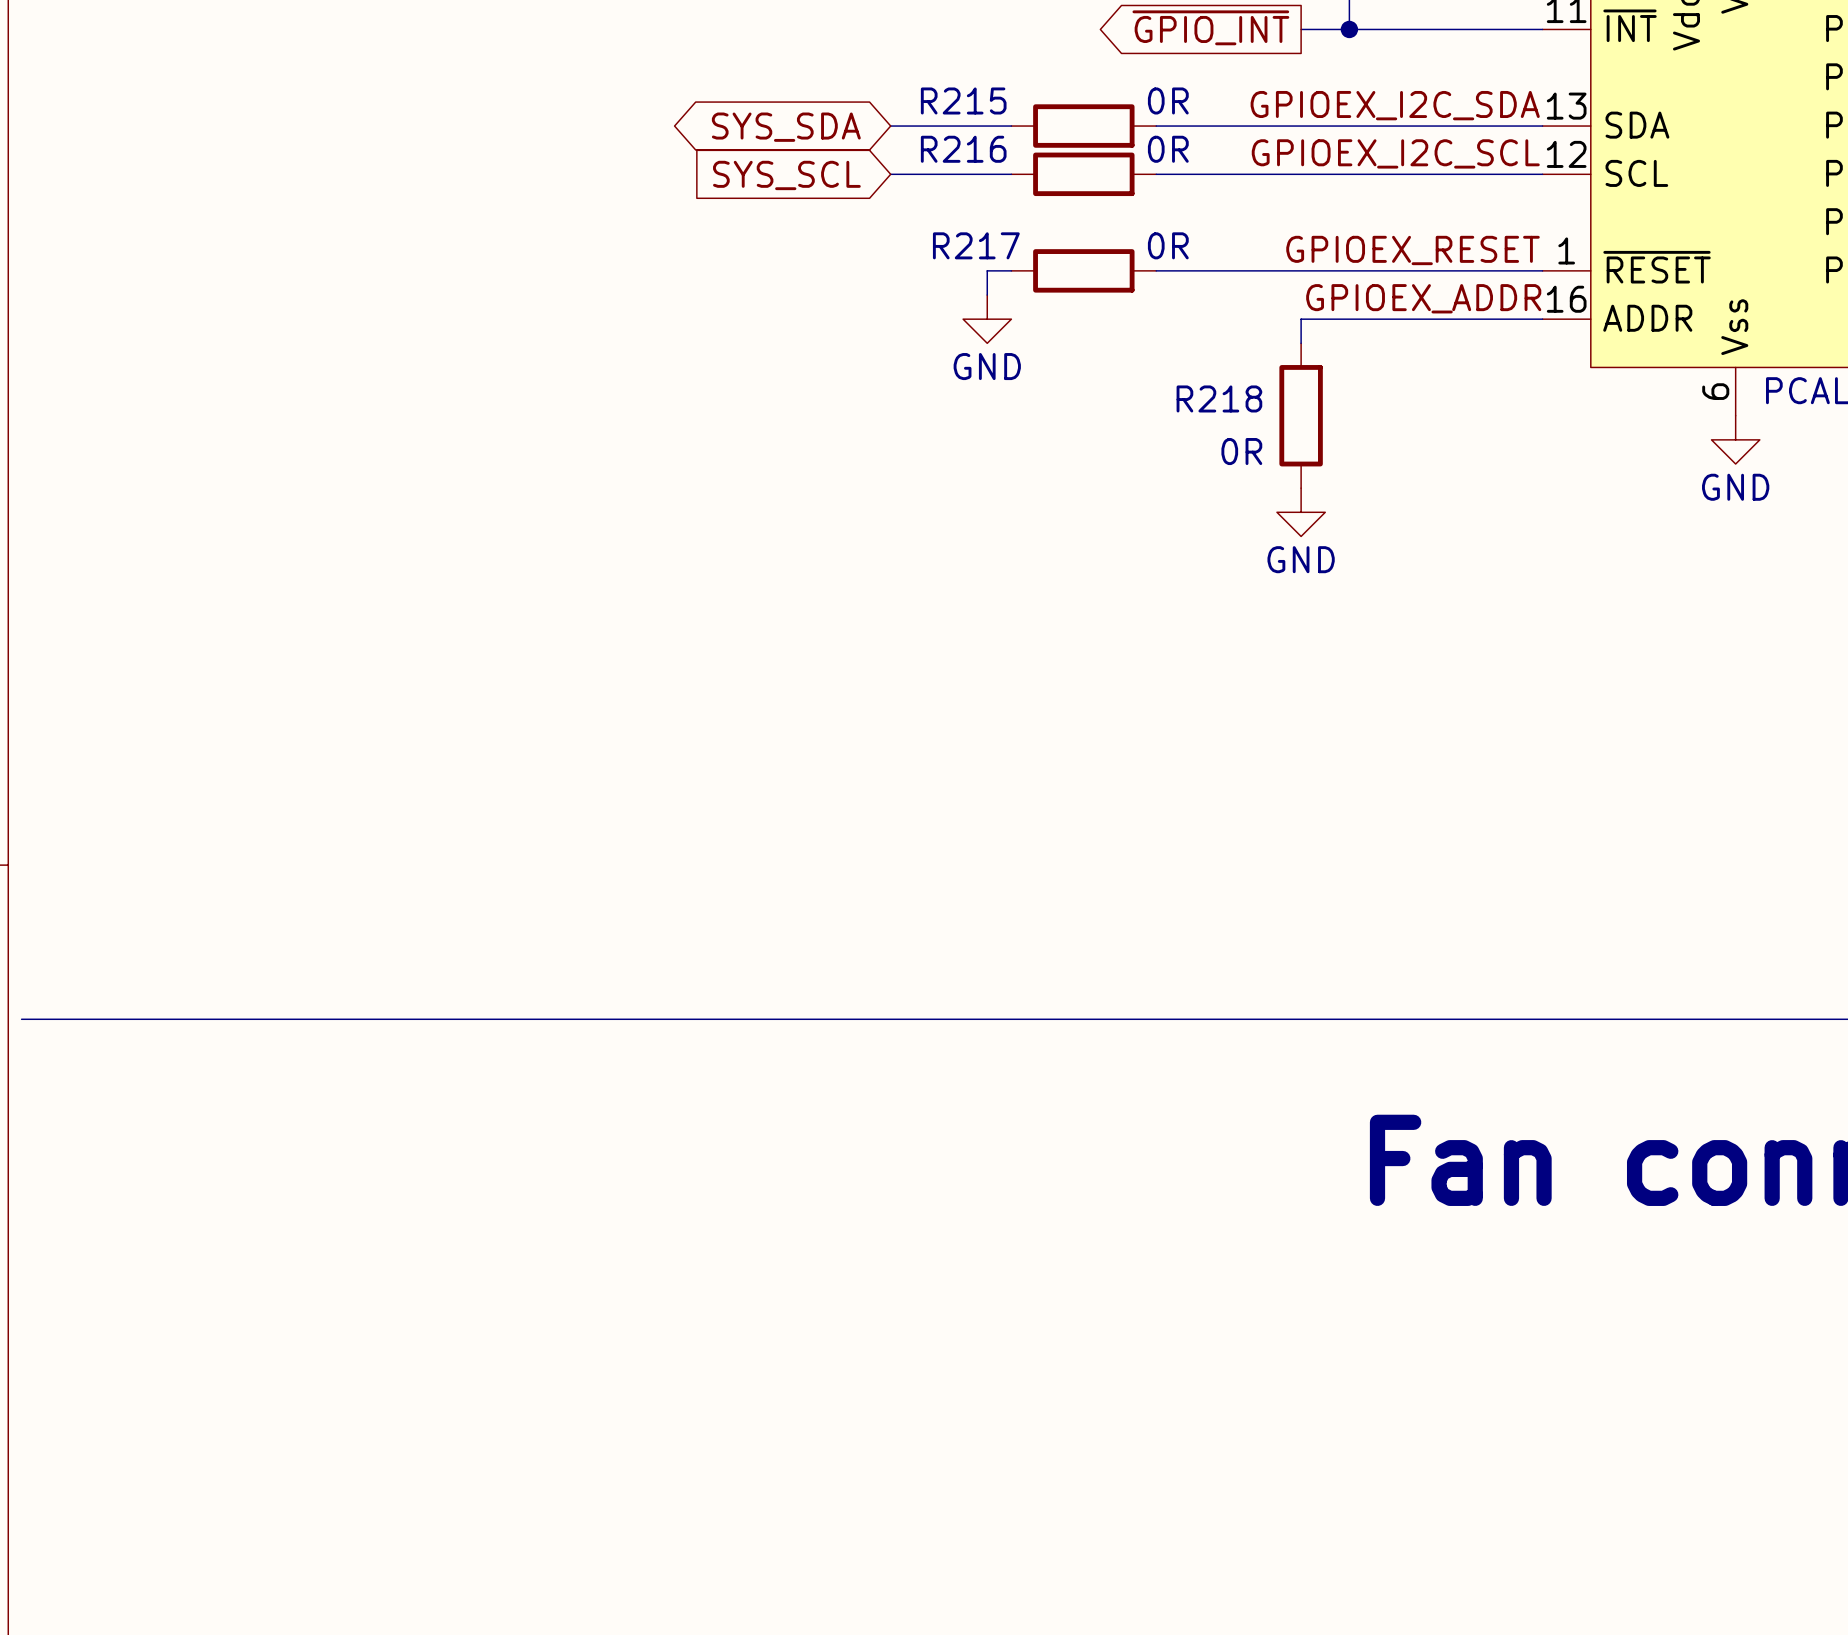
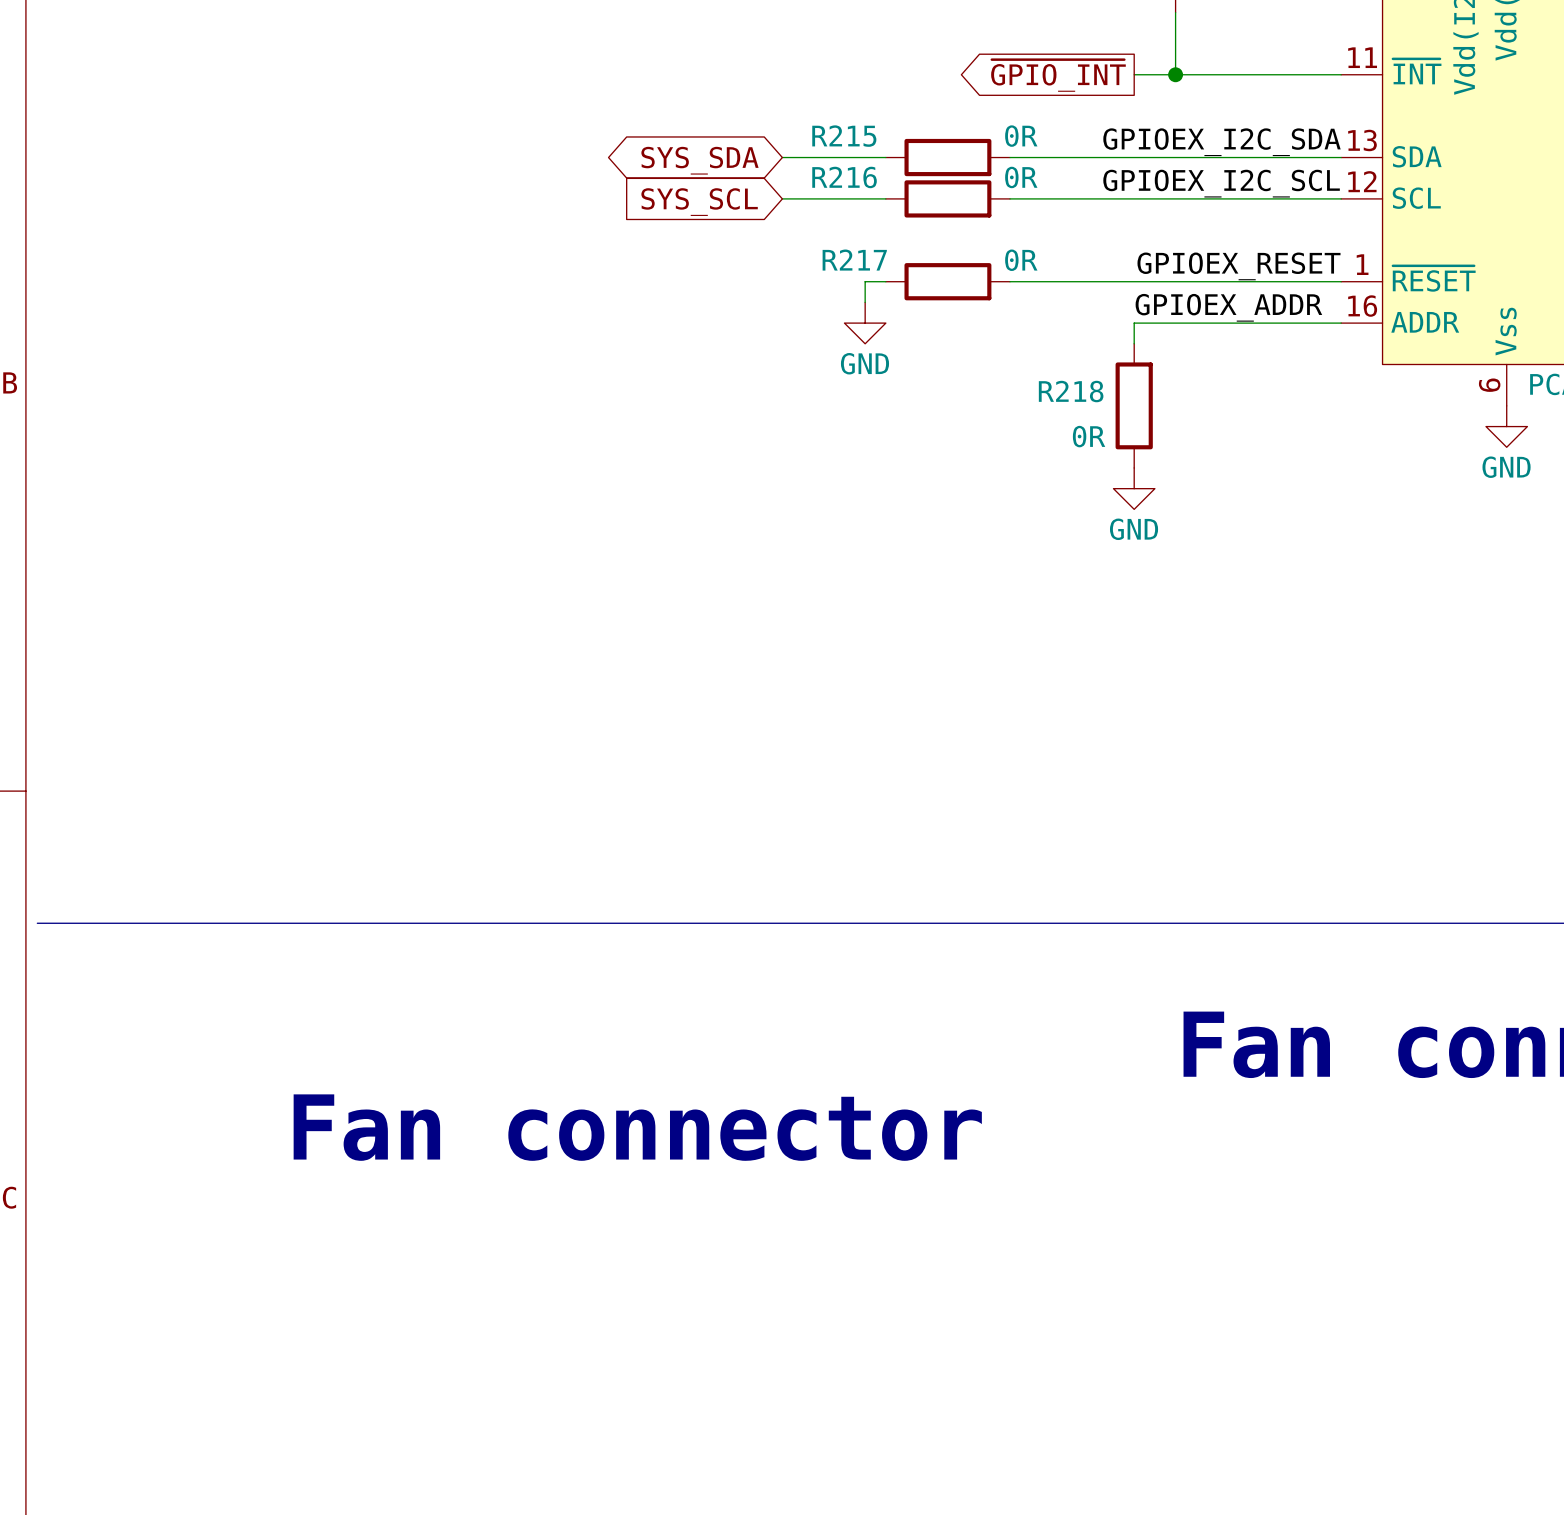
text: none -> Fan connector (637, 1127)

